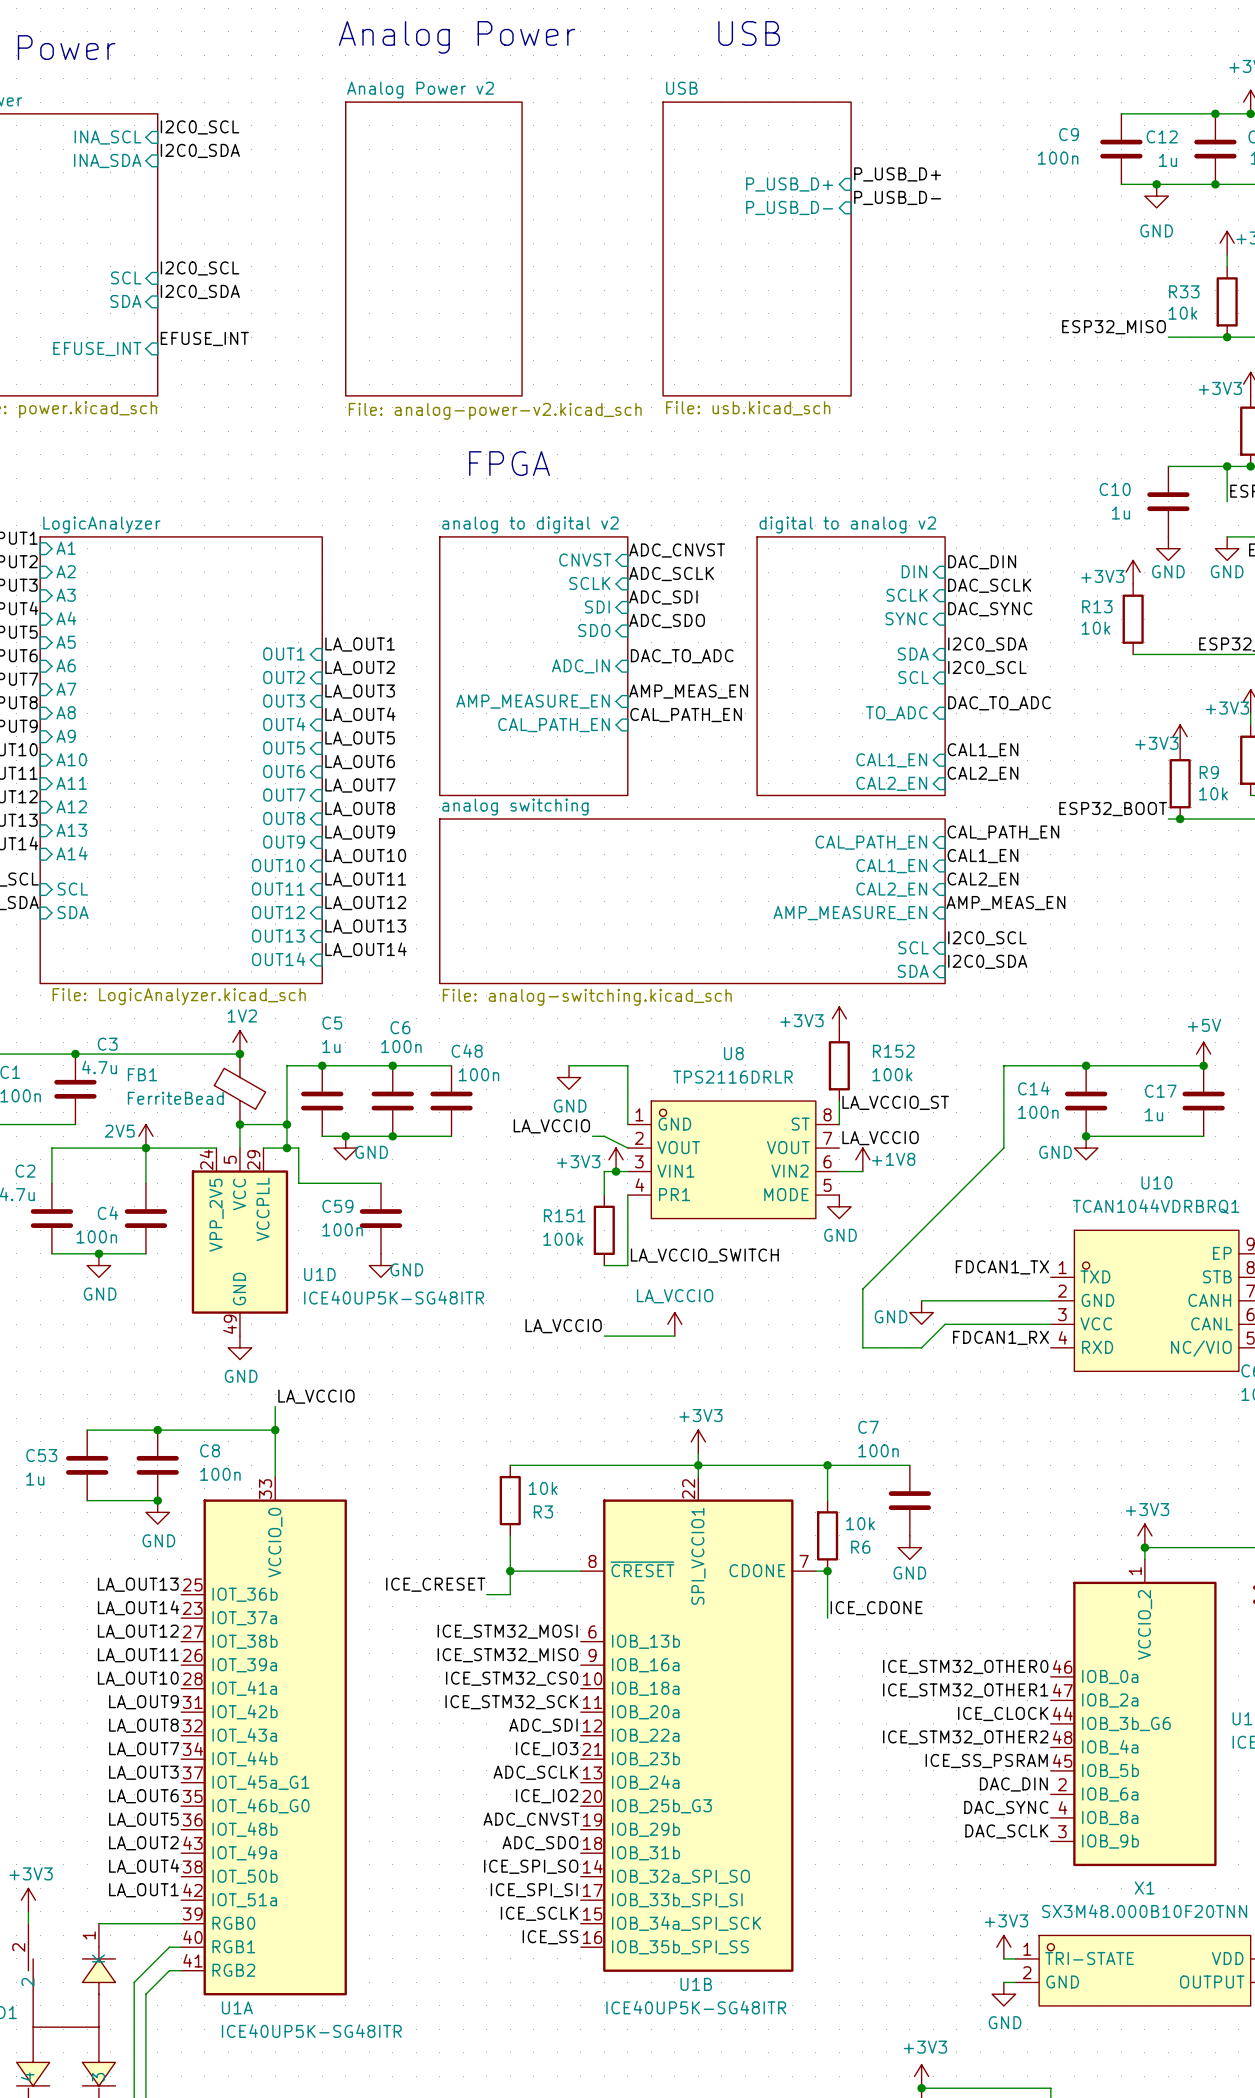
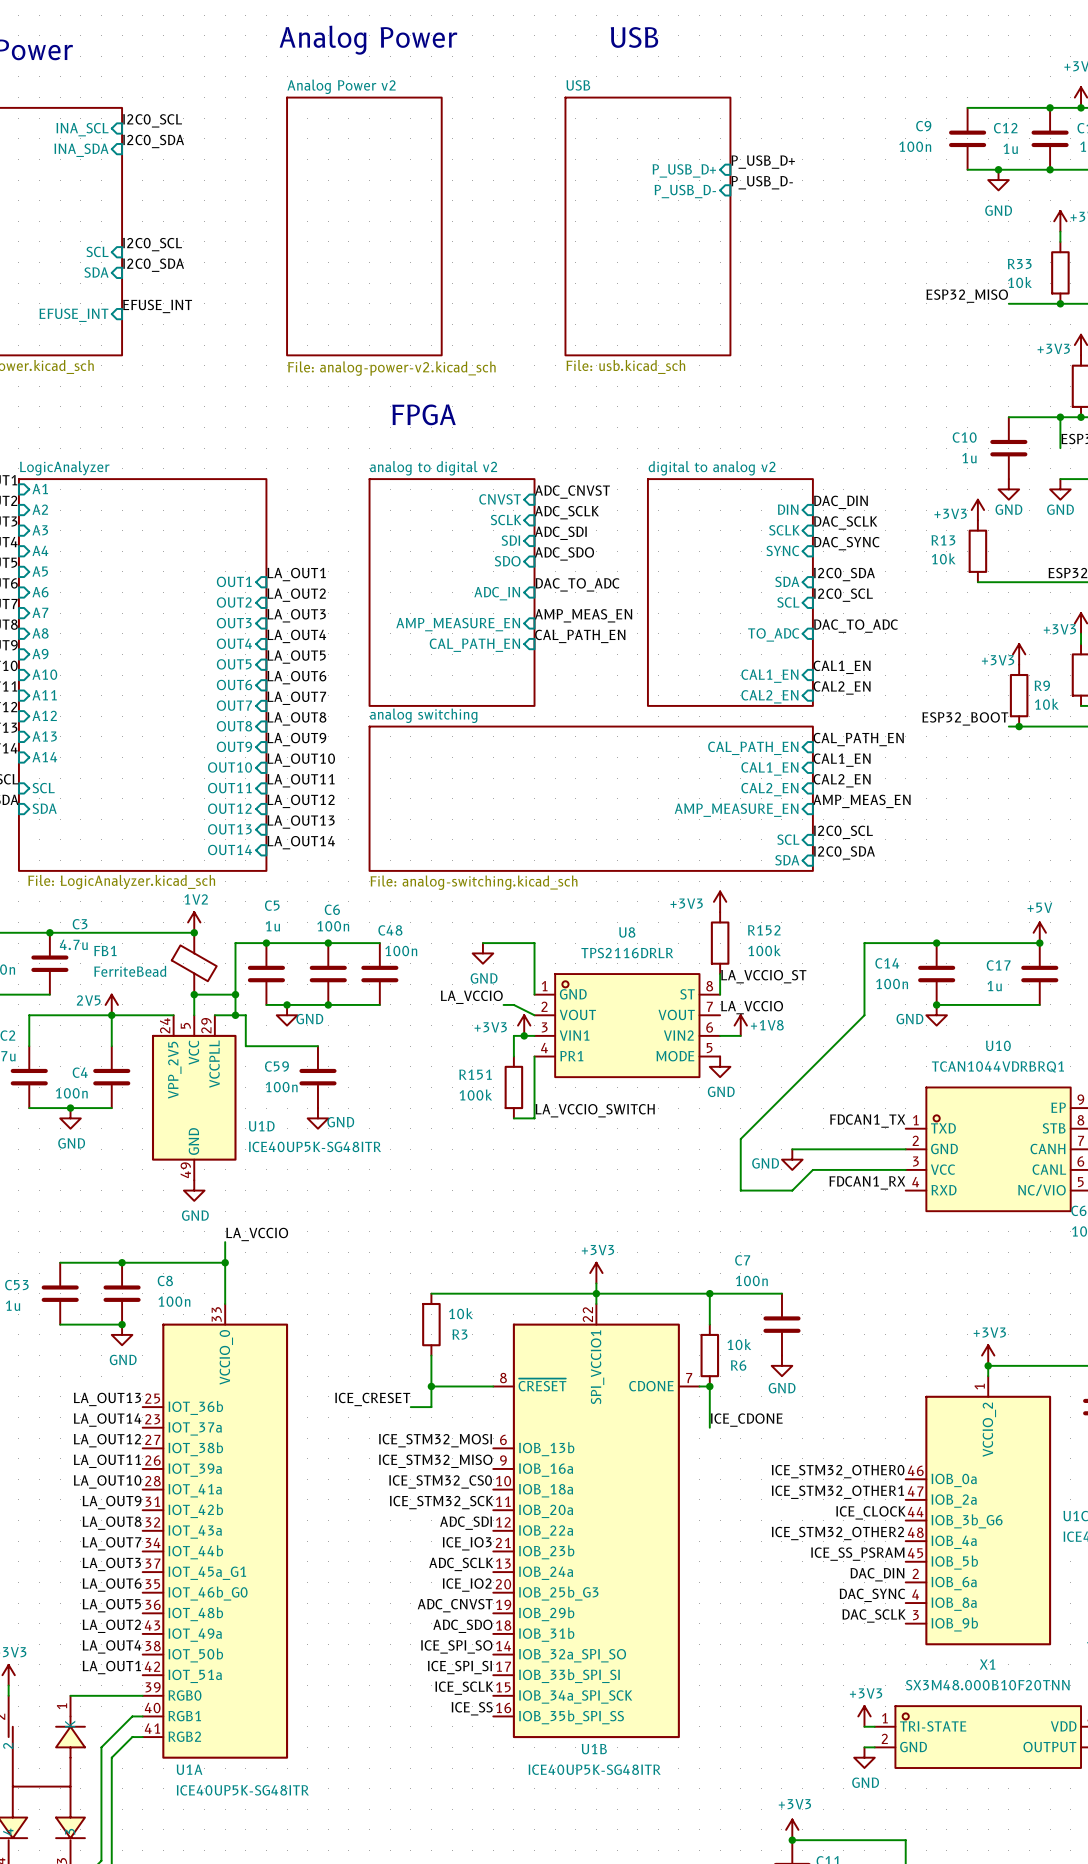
power symbol: LA_VCCIO (674, 1324) -> none
label: LA_VCCIO (563, 1326) -> none
wire: (604, 1336) (674, 1336) -> none

